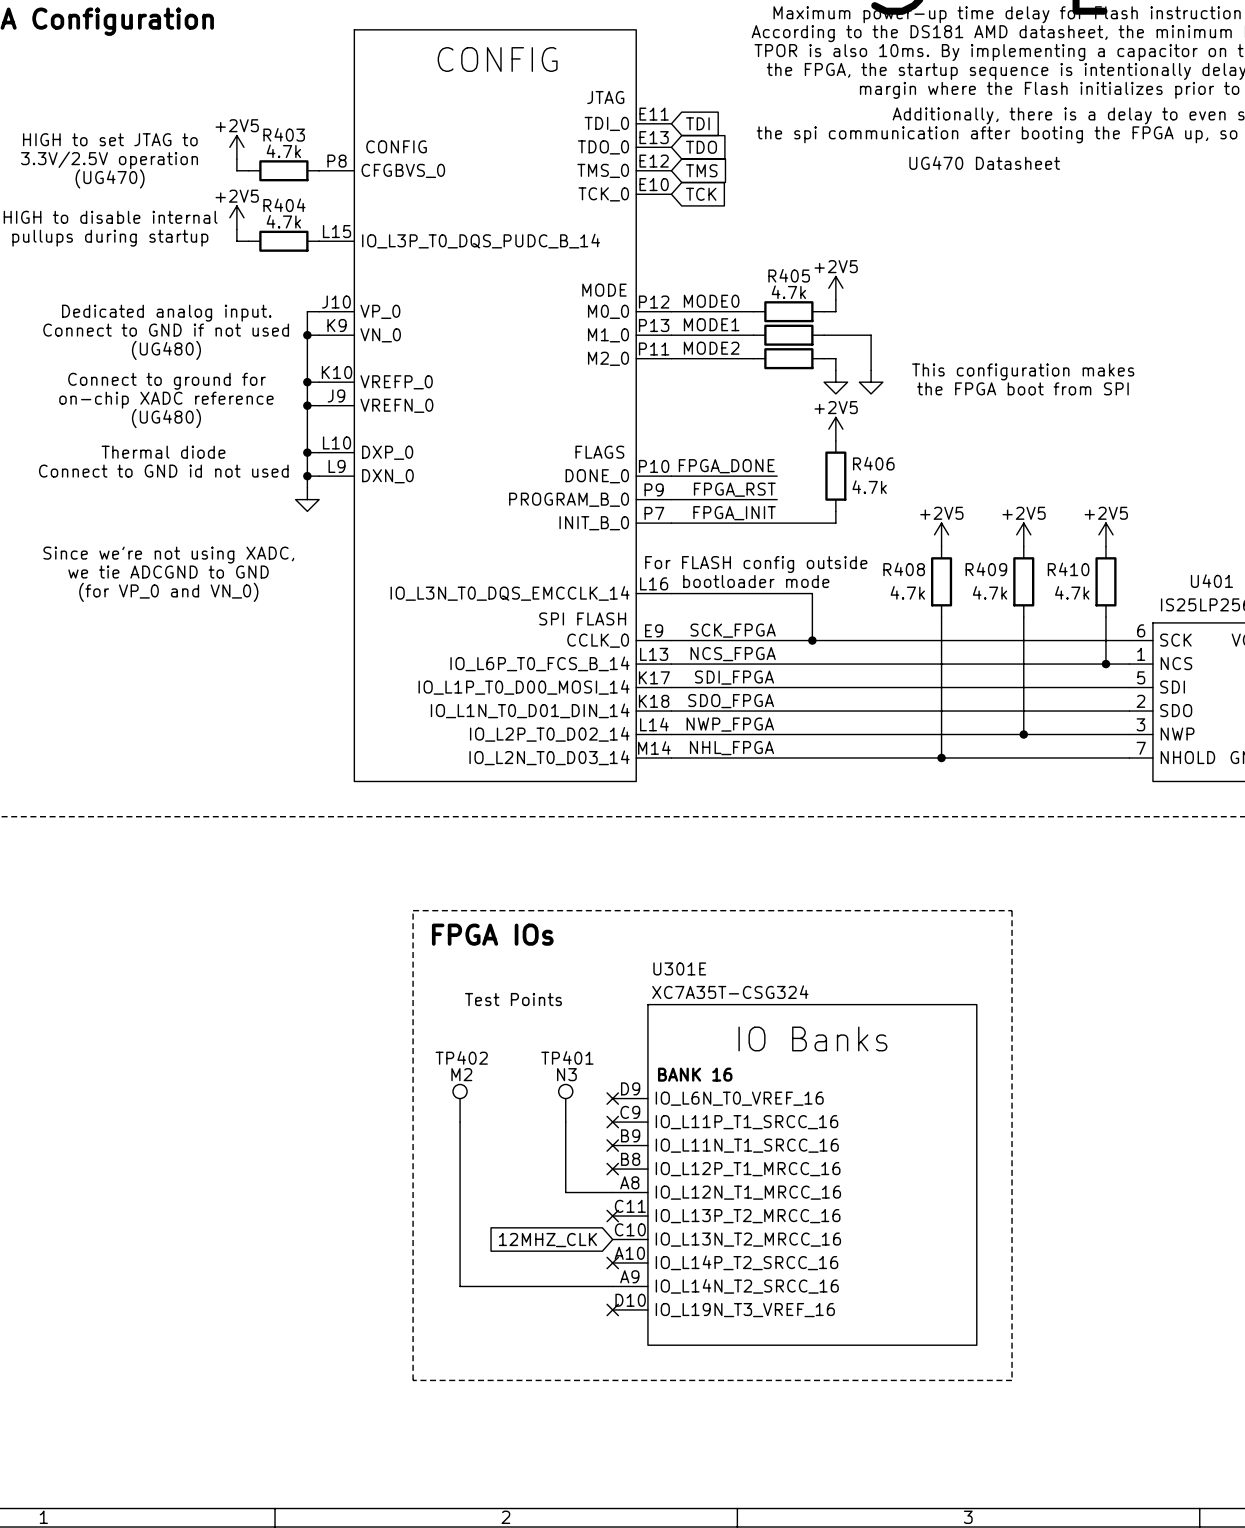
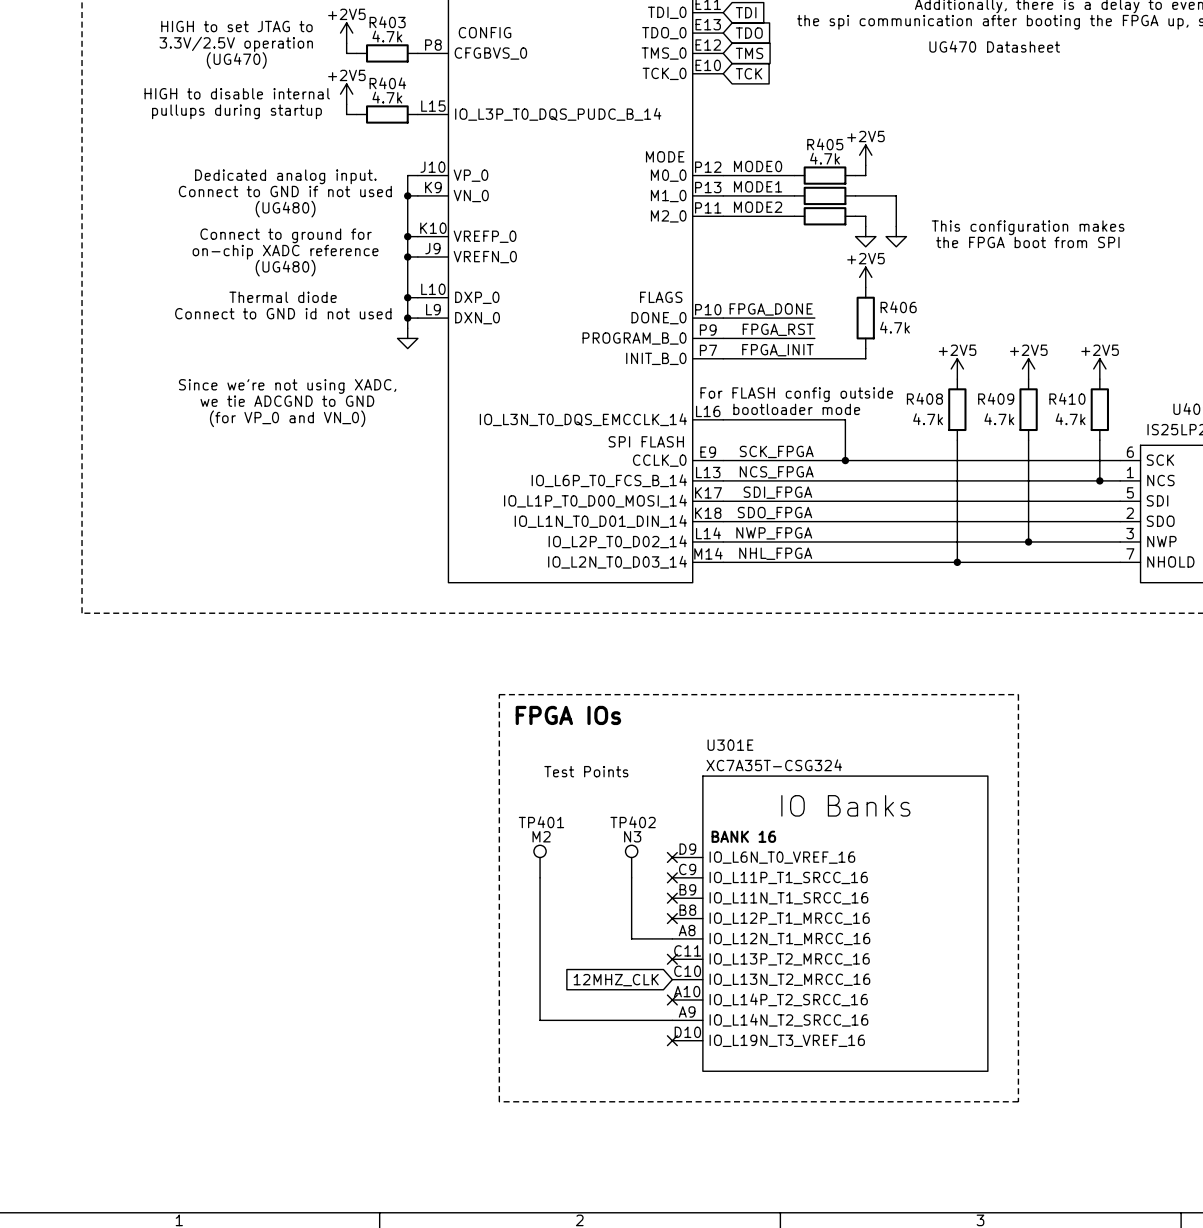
TP402 name: TP402 (461, 1057) -> TP401 (541, 822)
TP401 name: TP401 (567, 1057) -> TP402 (633, 822)

